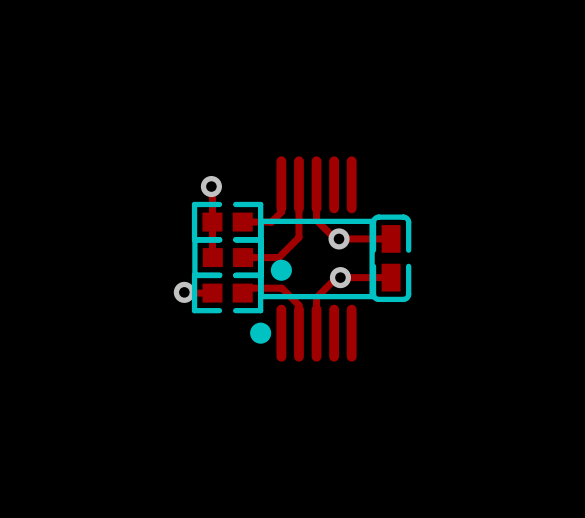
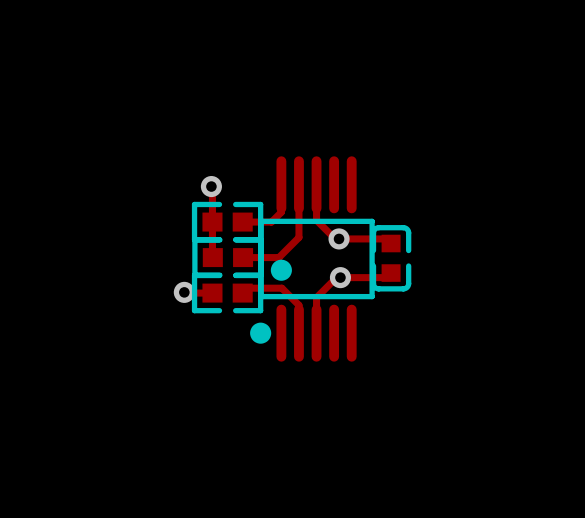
part footprint: [370, 214, 412, 303] -> [370, 225, 412, 292]

